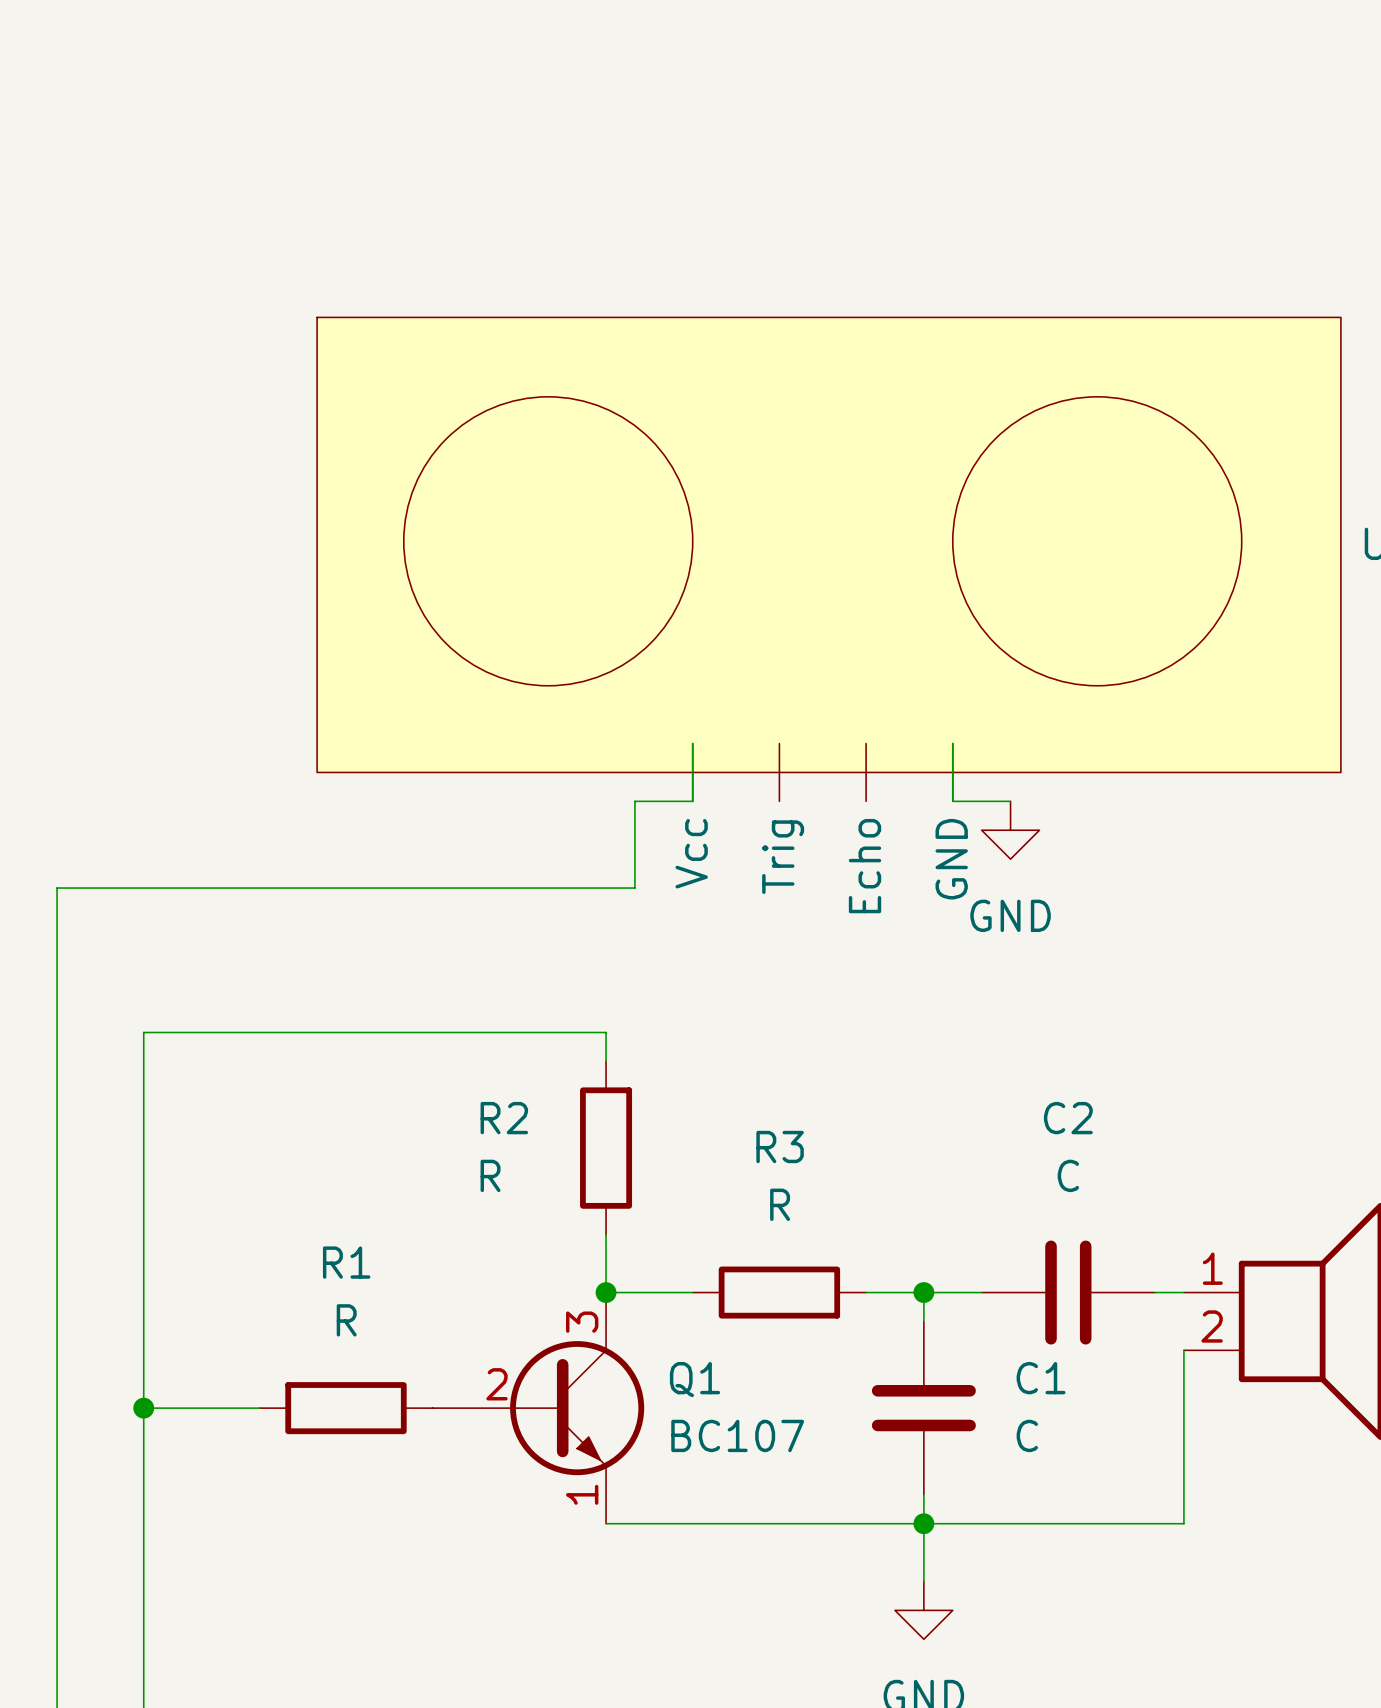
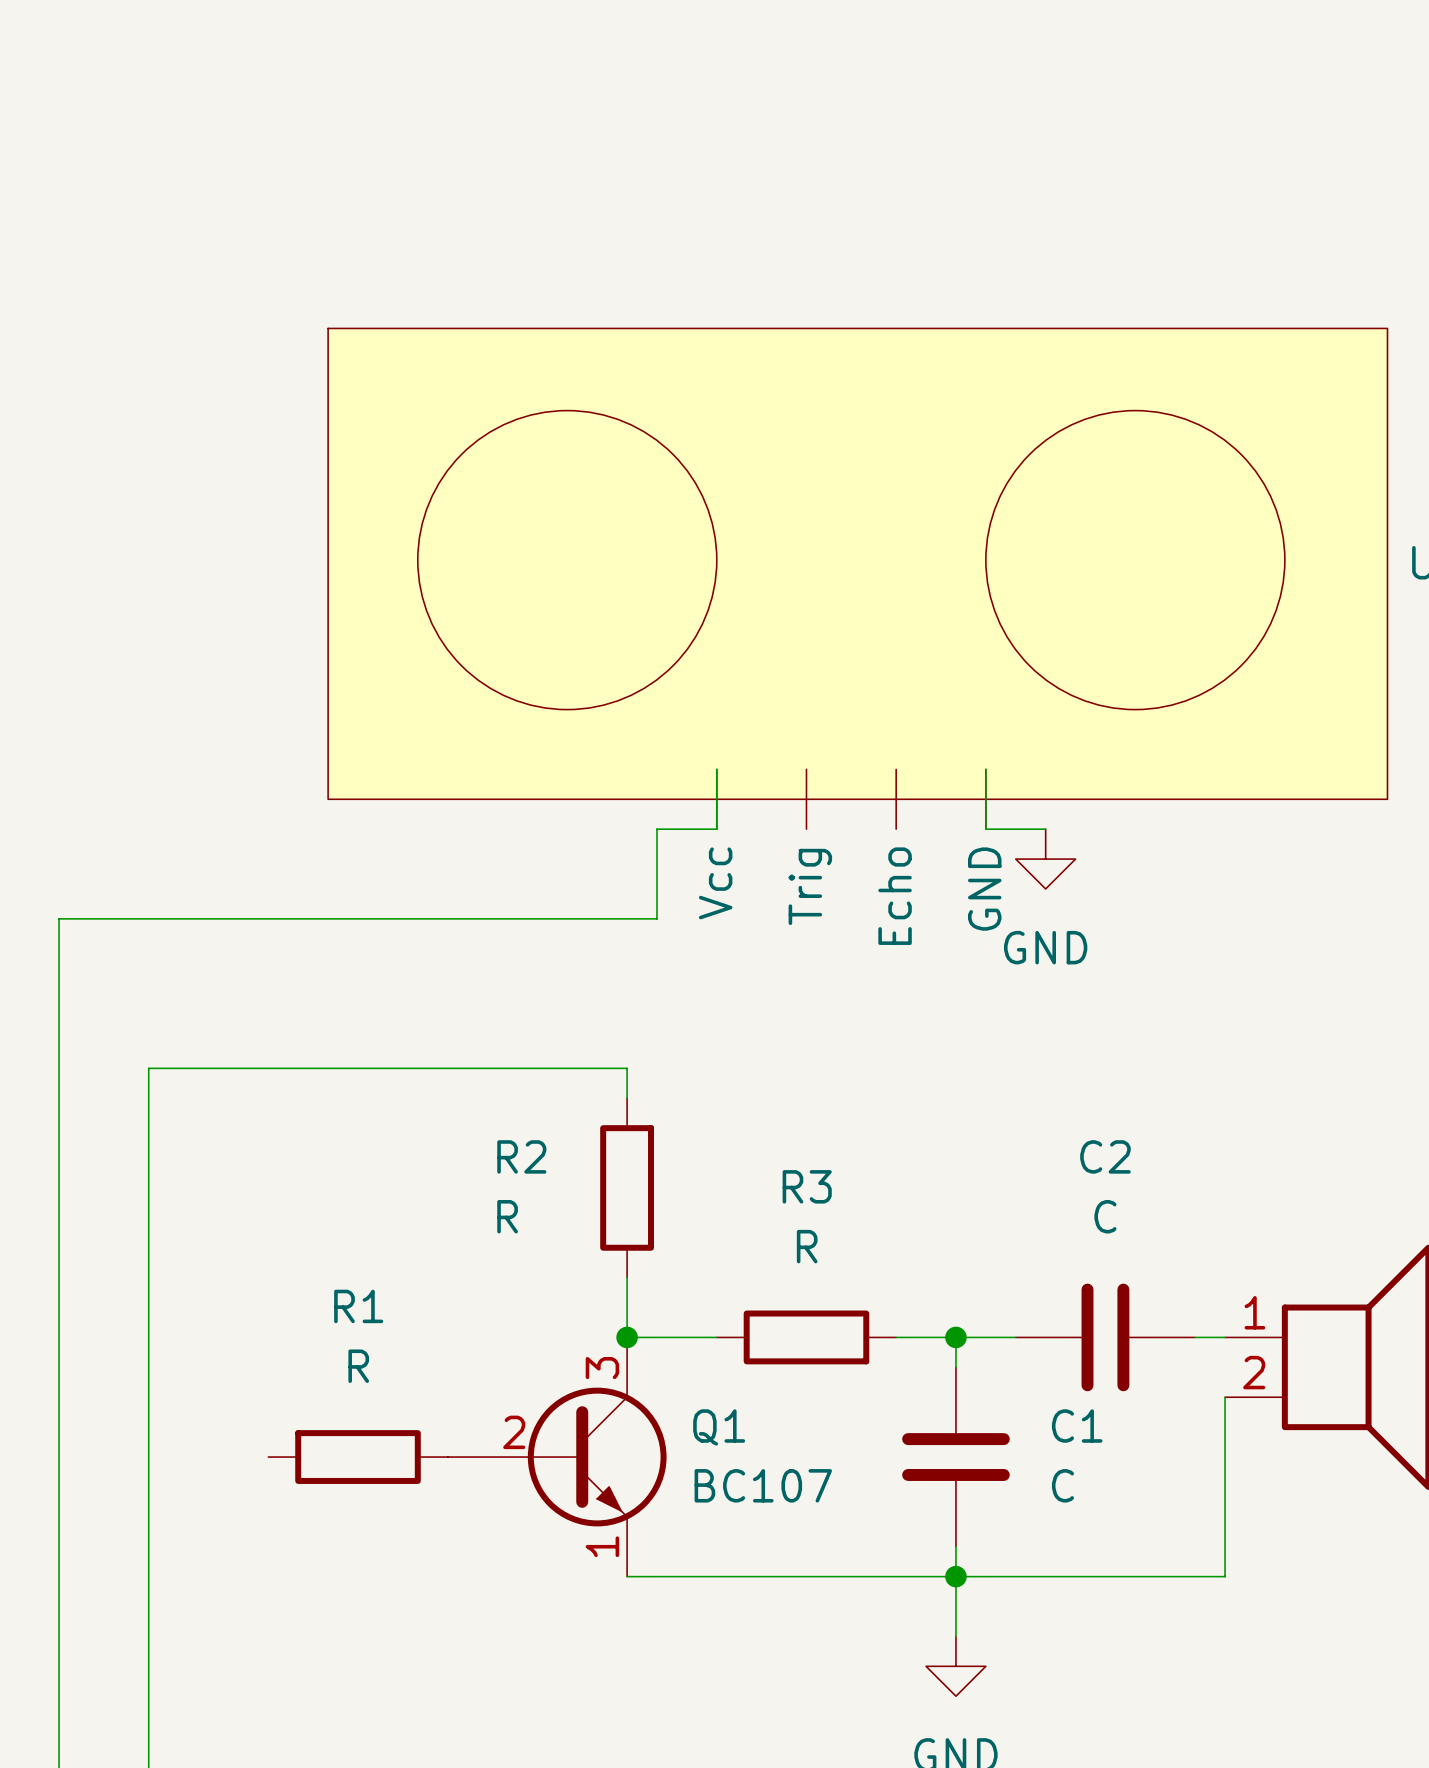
wire: (143, 1408) (259, 1408) -> none
junction: (143, 1408) -> none

